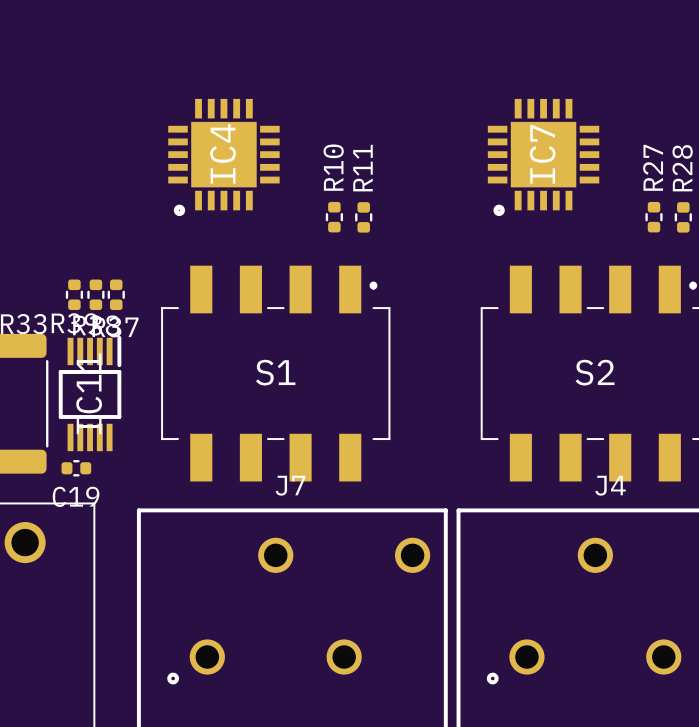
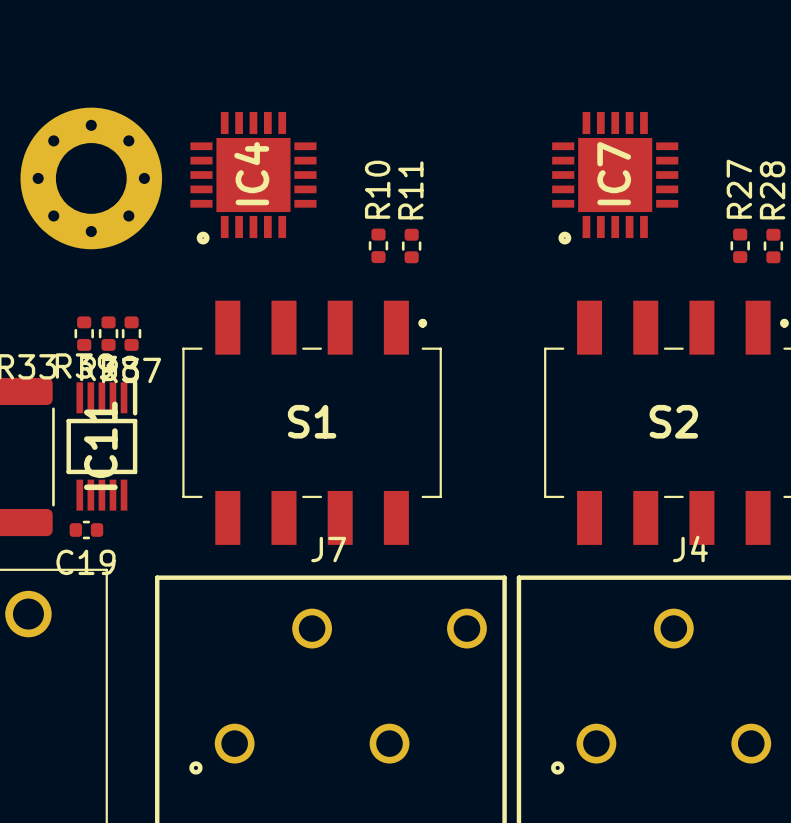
part: none -> (91, 178)

